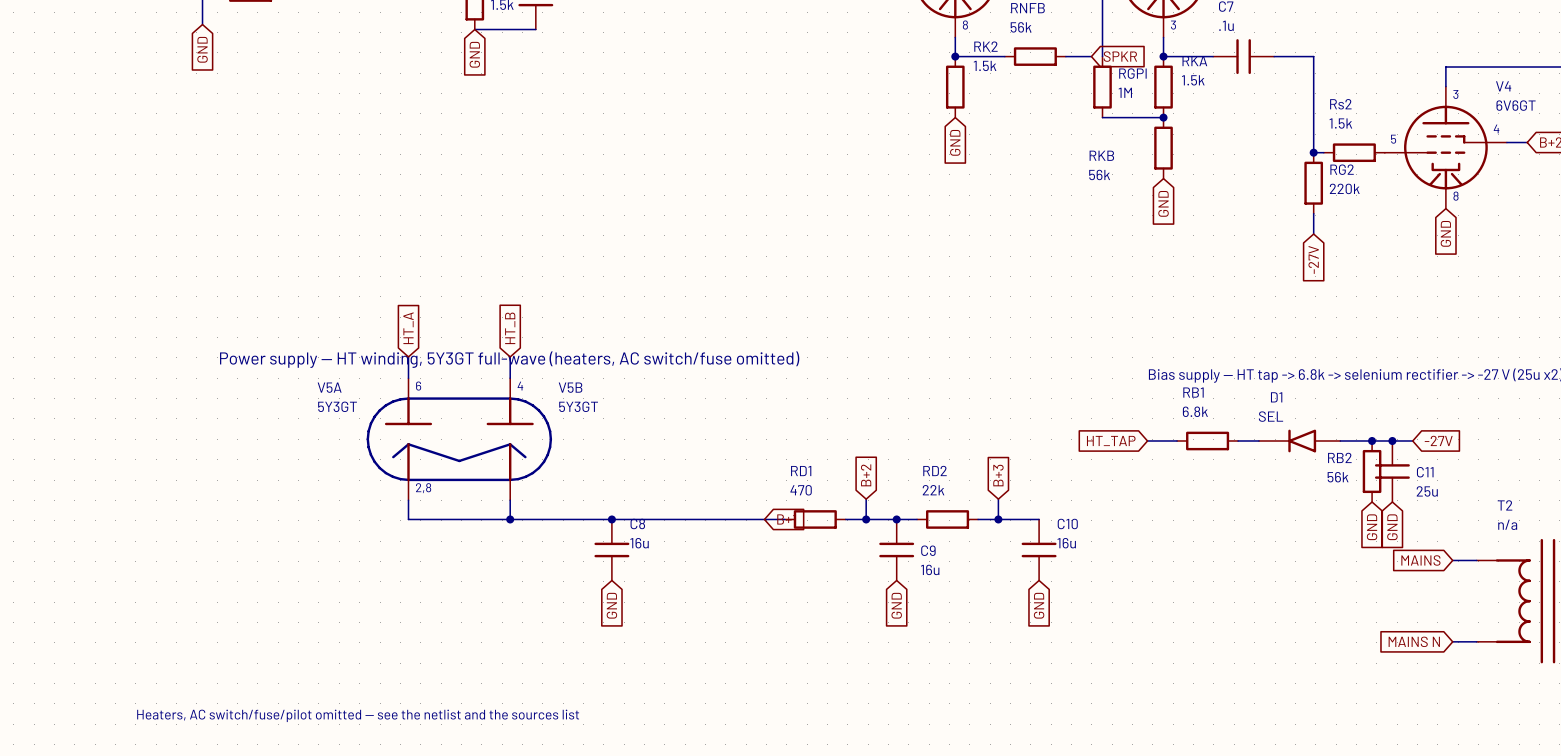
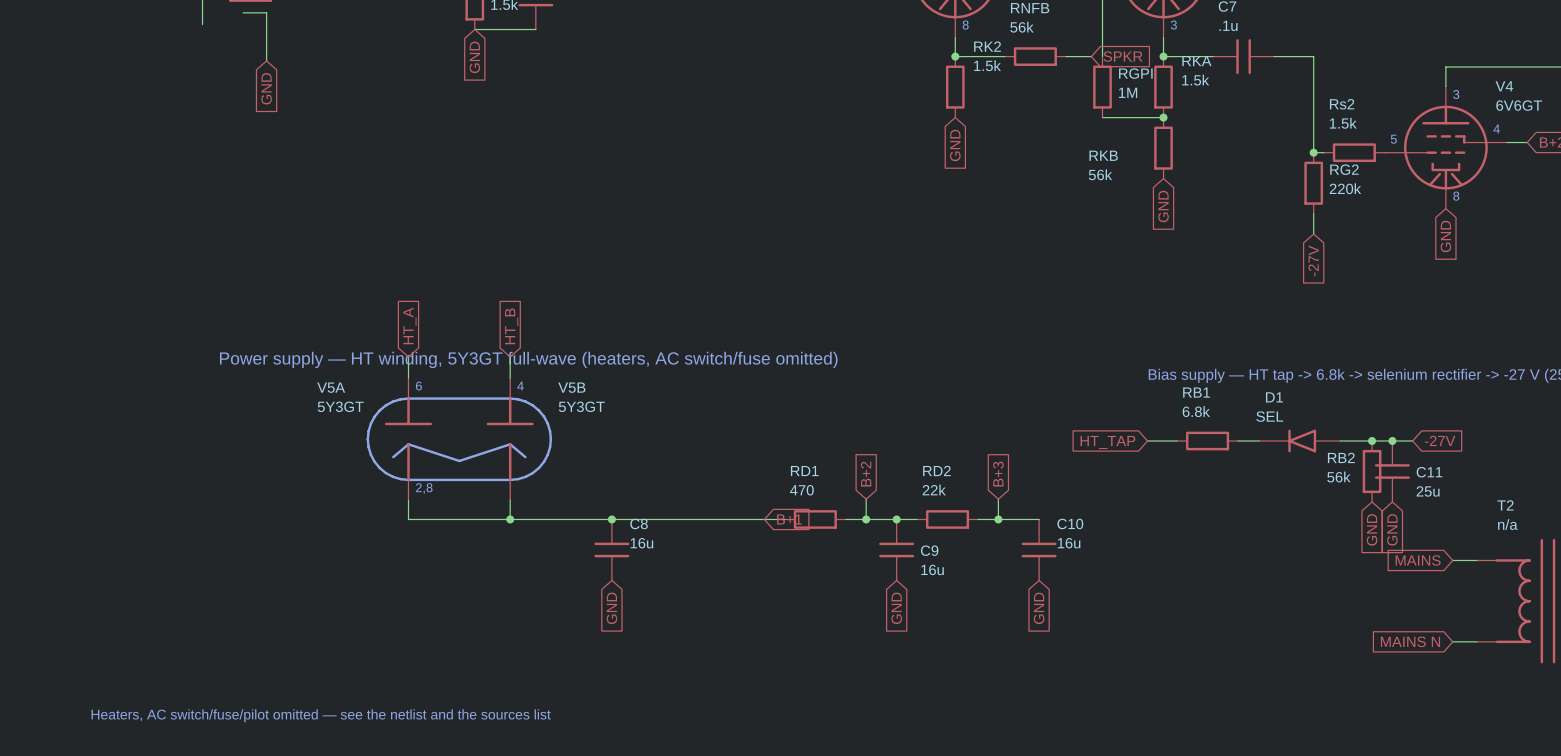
wire: none -> (243, 12) (266, 12) (266, 60)
global label position: GND (202, 49) -> GND (266, 88)
text position: Heaters, AC switch/fuse/pilot omitted — see the netlist and the sources list (358, 715) -> Heaters, AC switch/fuse/pilot omitted — see the netlist and the sources list (321, 715)

